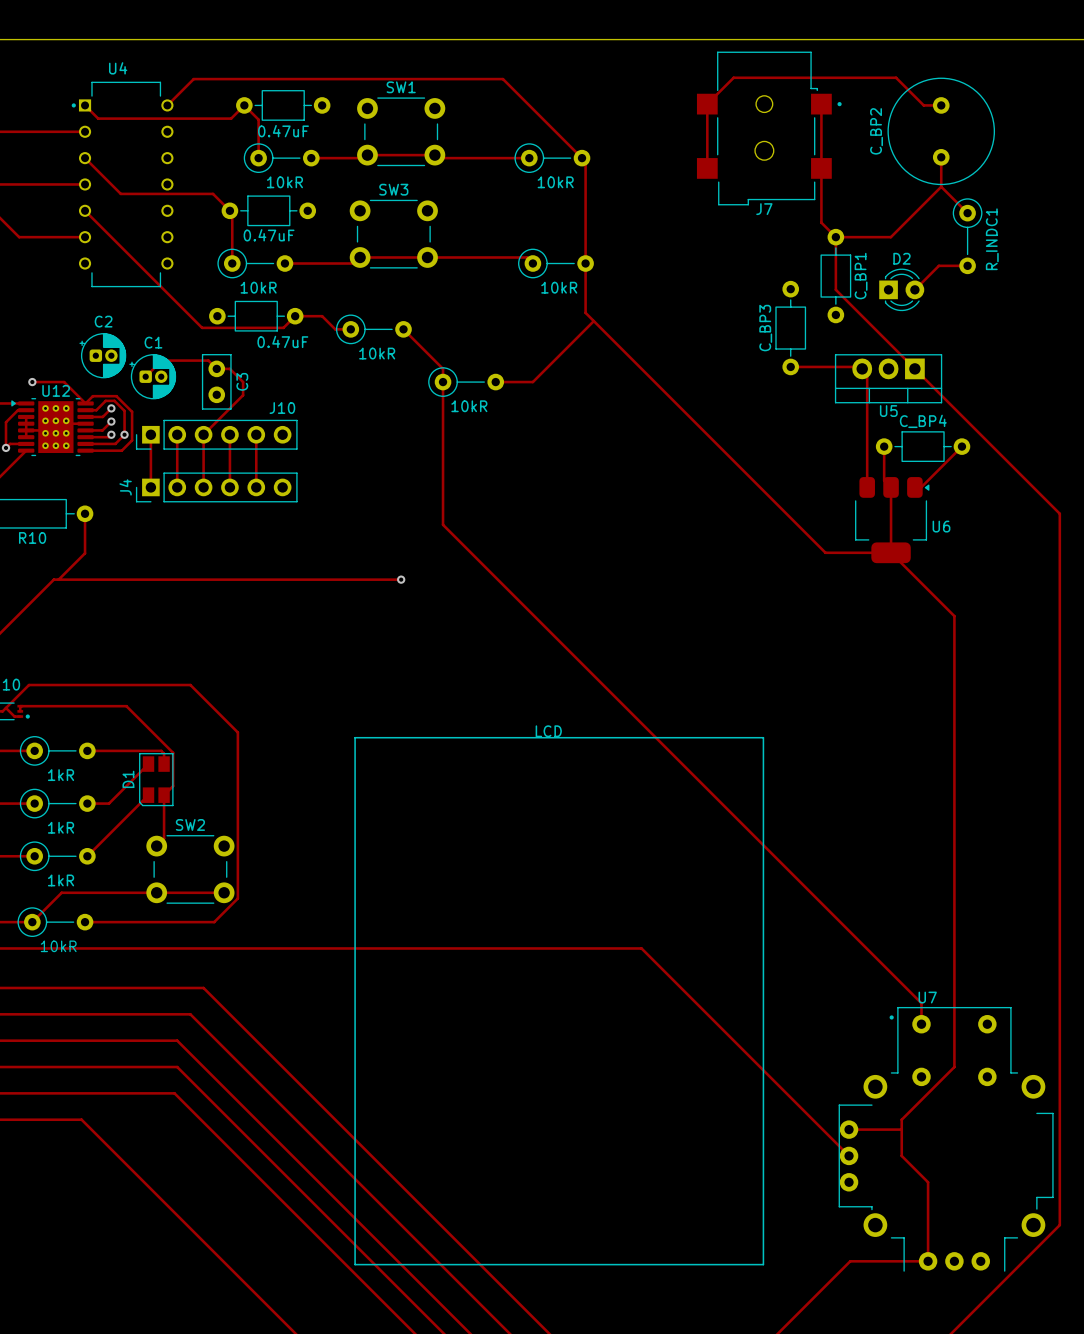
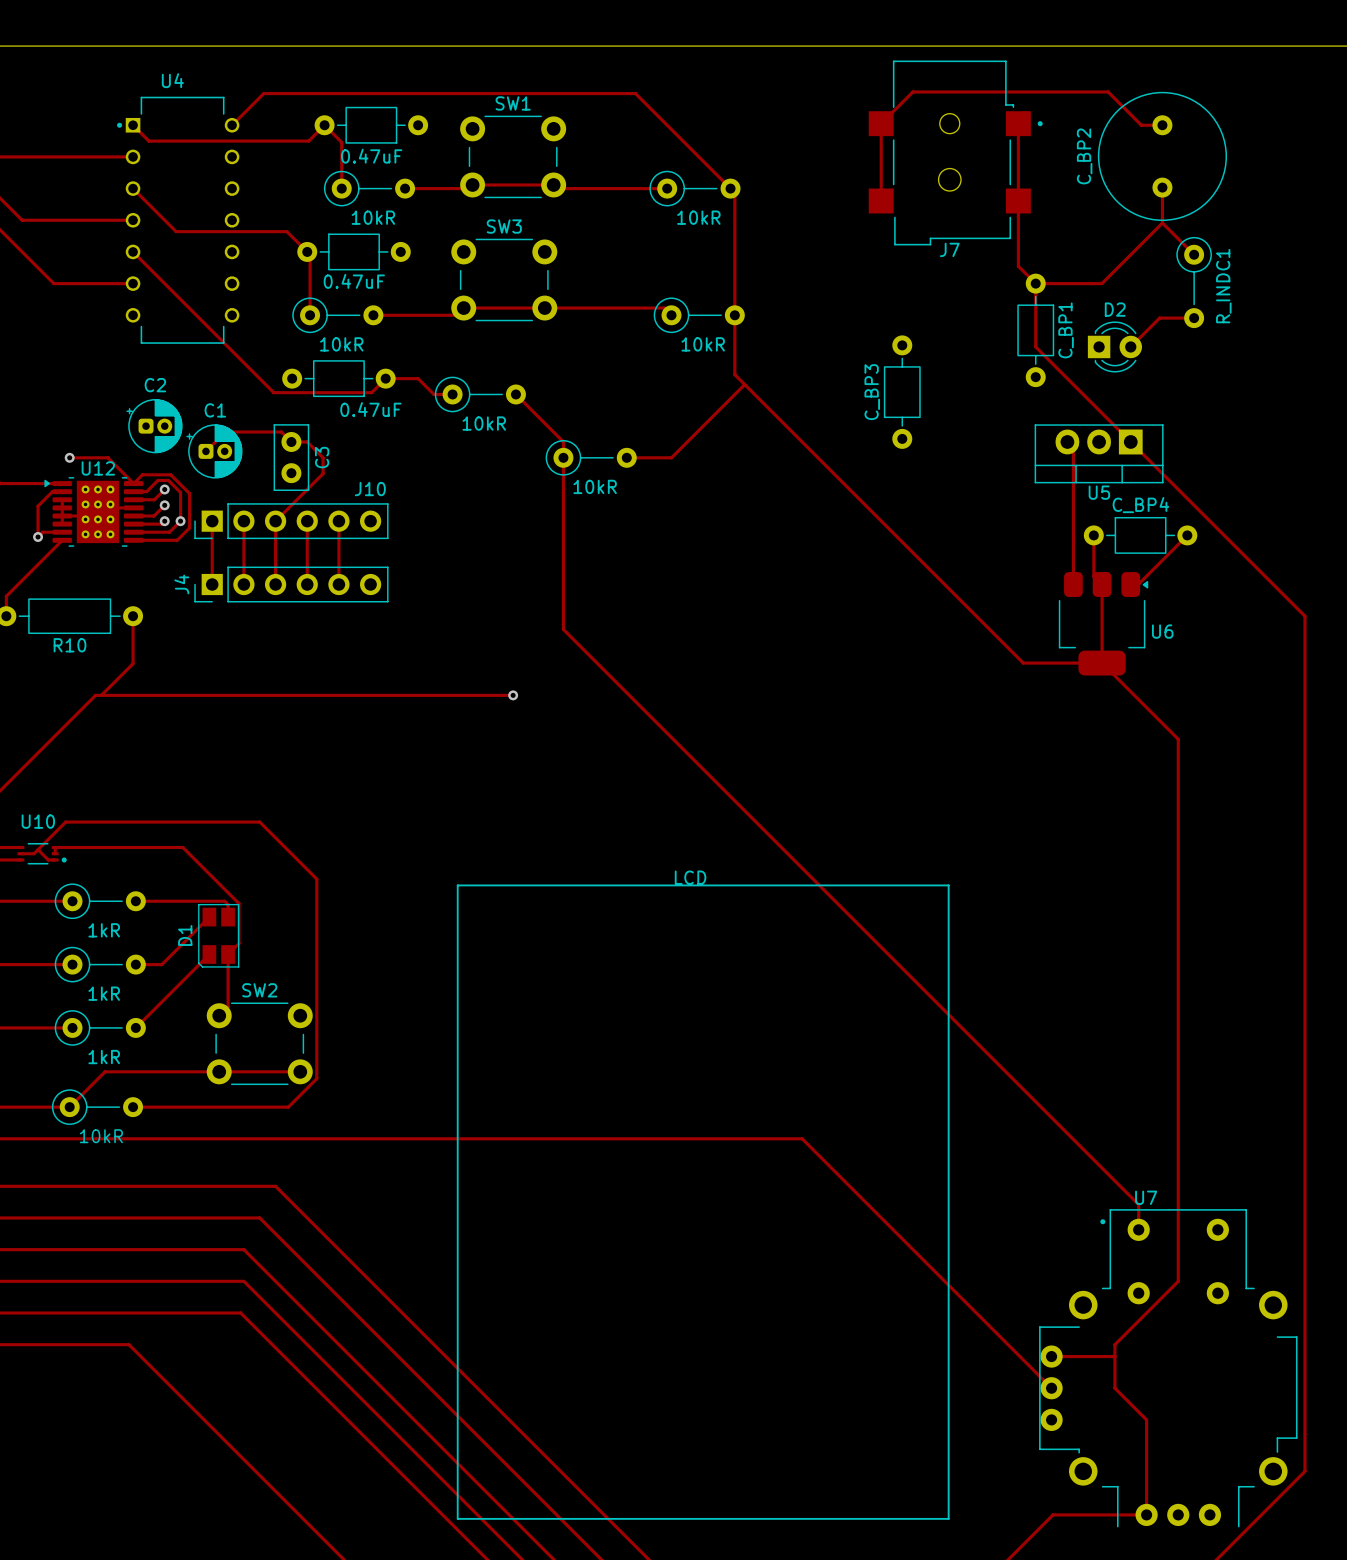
C_BP3 position: (790, 328) -> (902, 392)
track: (790, 366) (860, 366) (862, 368) -> none

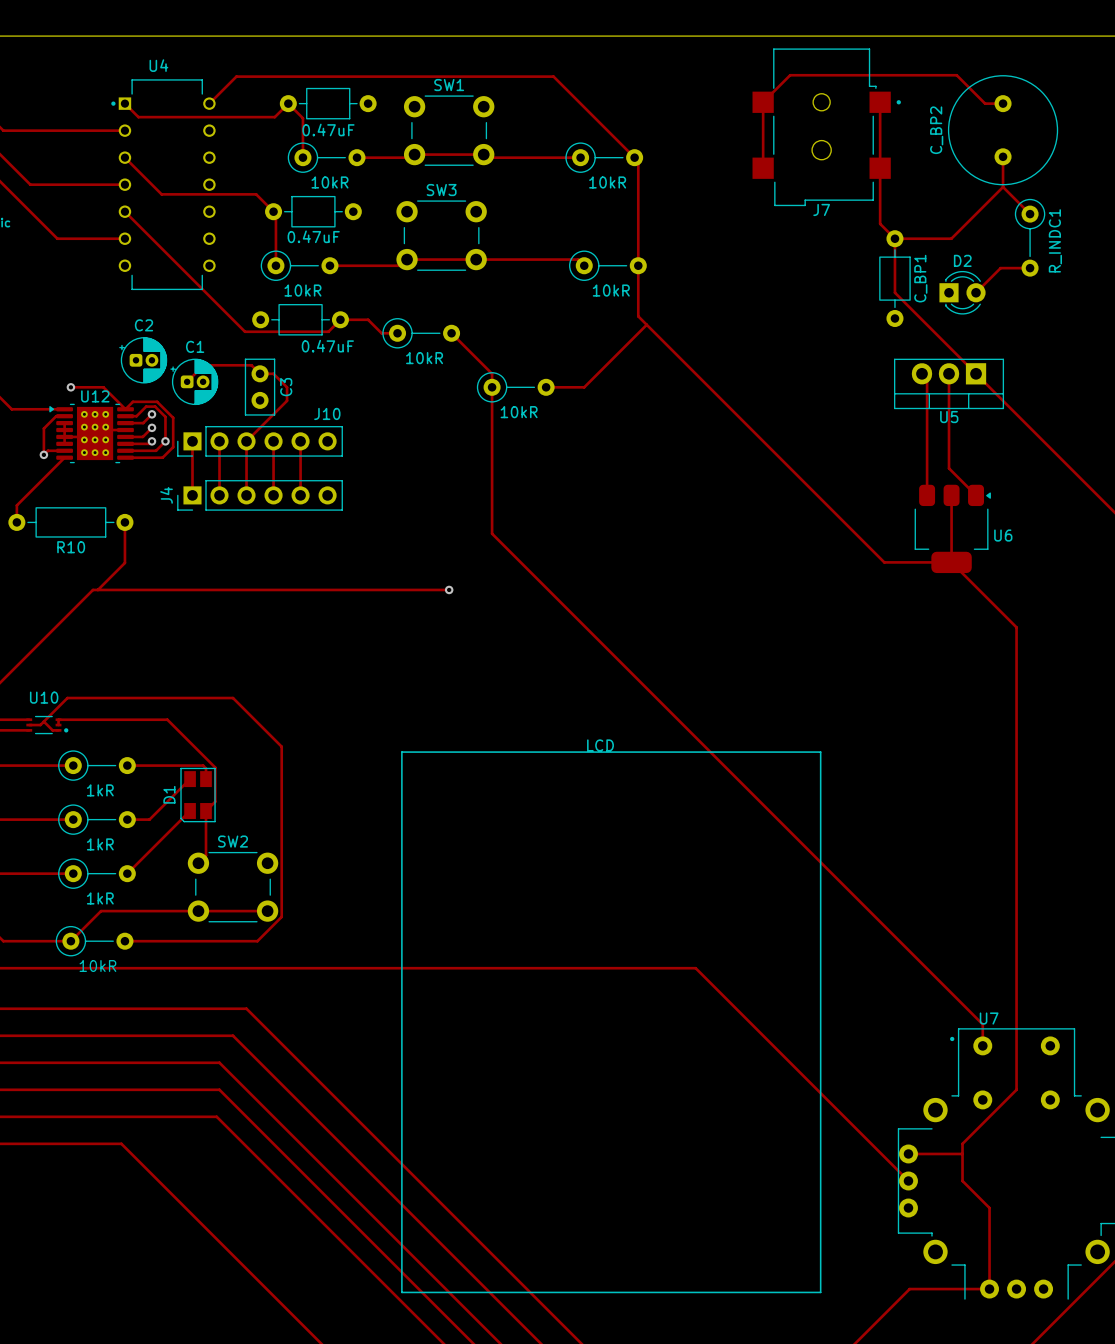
C_BP3: (902, 392) -> none
track: (1093, 535) (1093, 576) (1102, 584) -> none
C_BP4: (1140, 535) -> none
track: (1187, 535) (1138, 584) (1130, 584) -> (949, 373) (949, 468) (976, 495)

